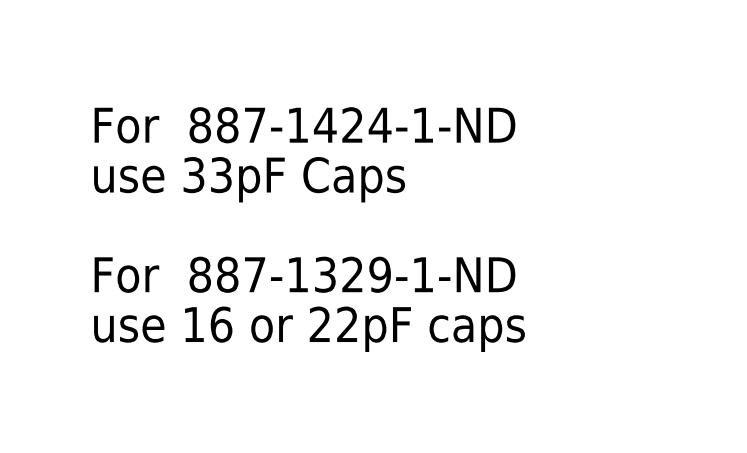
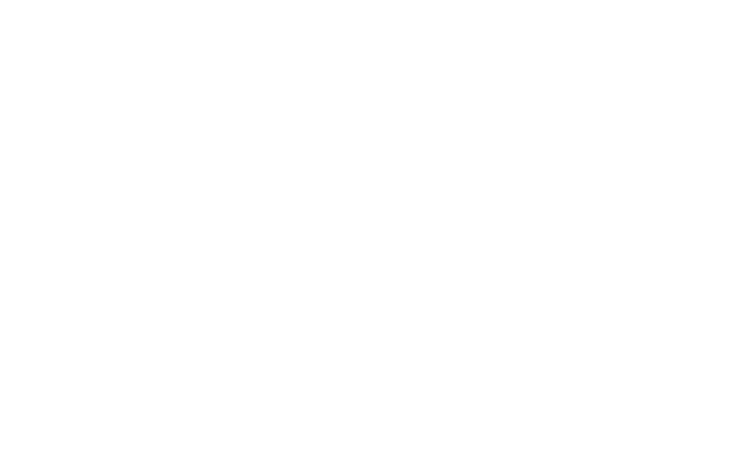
text: For 887-1424-1-ND (304, 125) -> none
text: use 33pF Caps (249, 179) -> none
text: For 887-1329-1-ND (304, 274) -> none
text: use 16 or 22pF caps (309, 329) -> none

